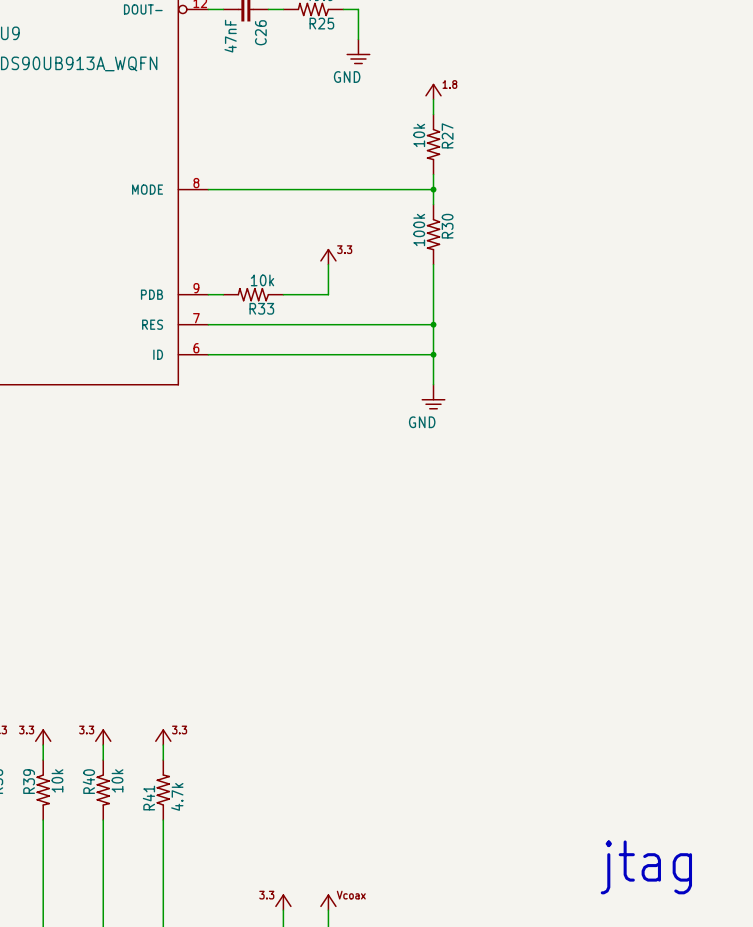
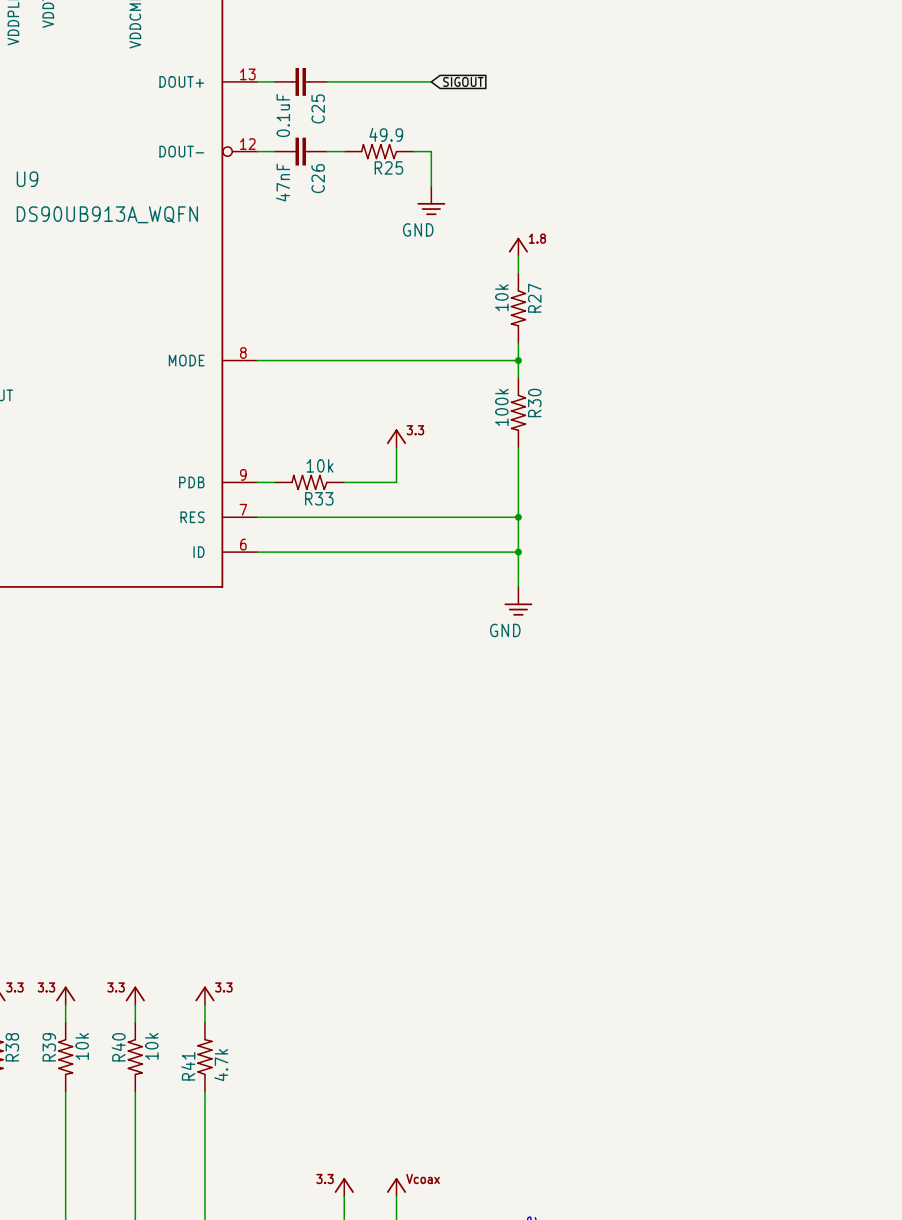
text: jtag (646, 867) -> none

